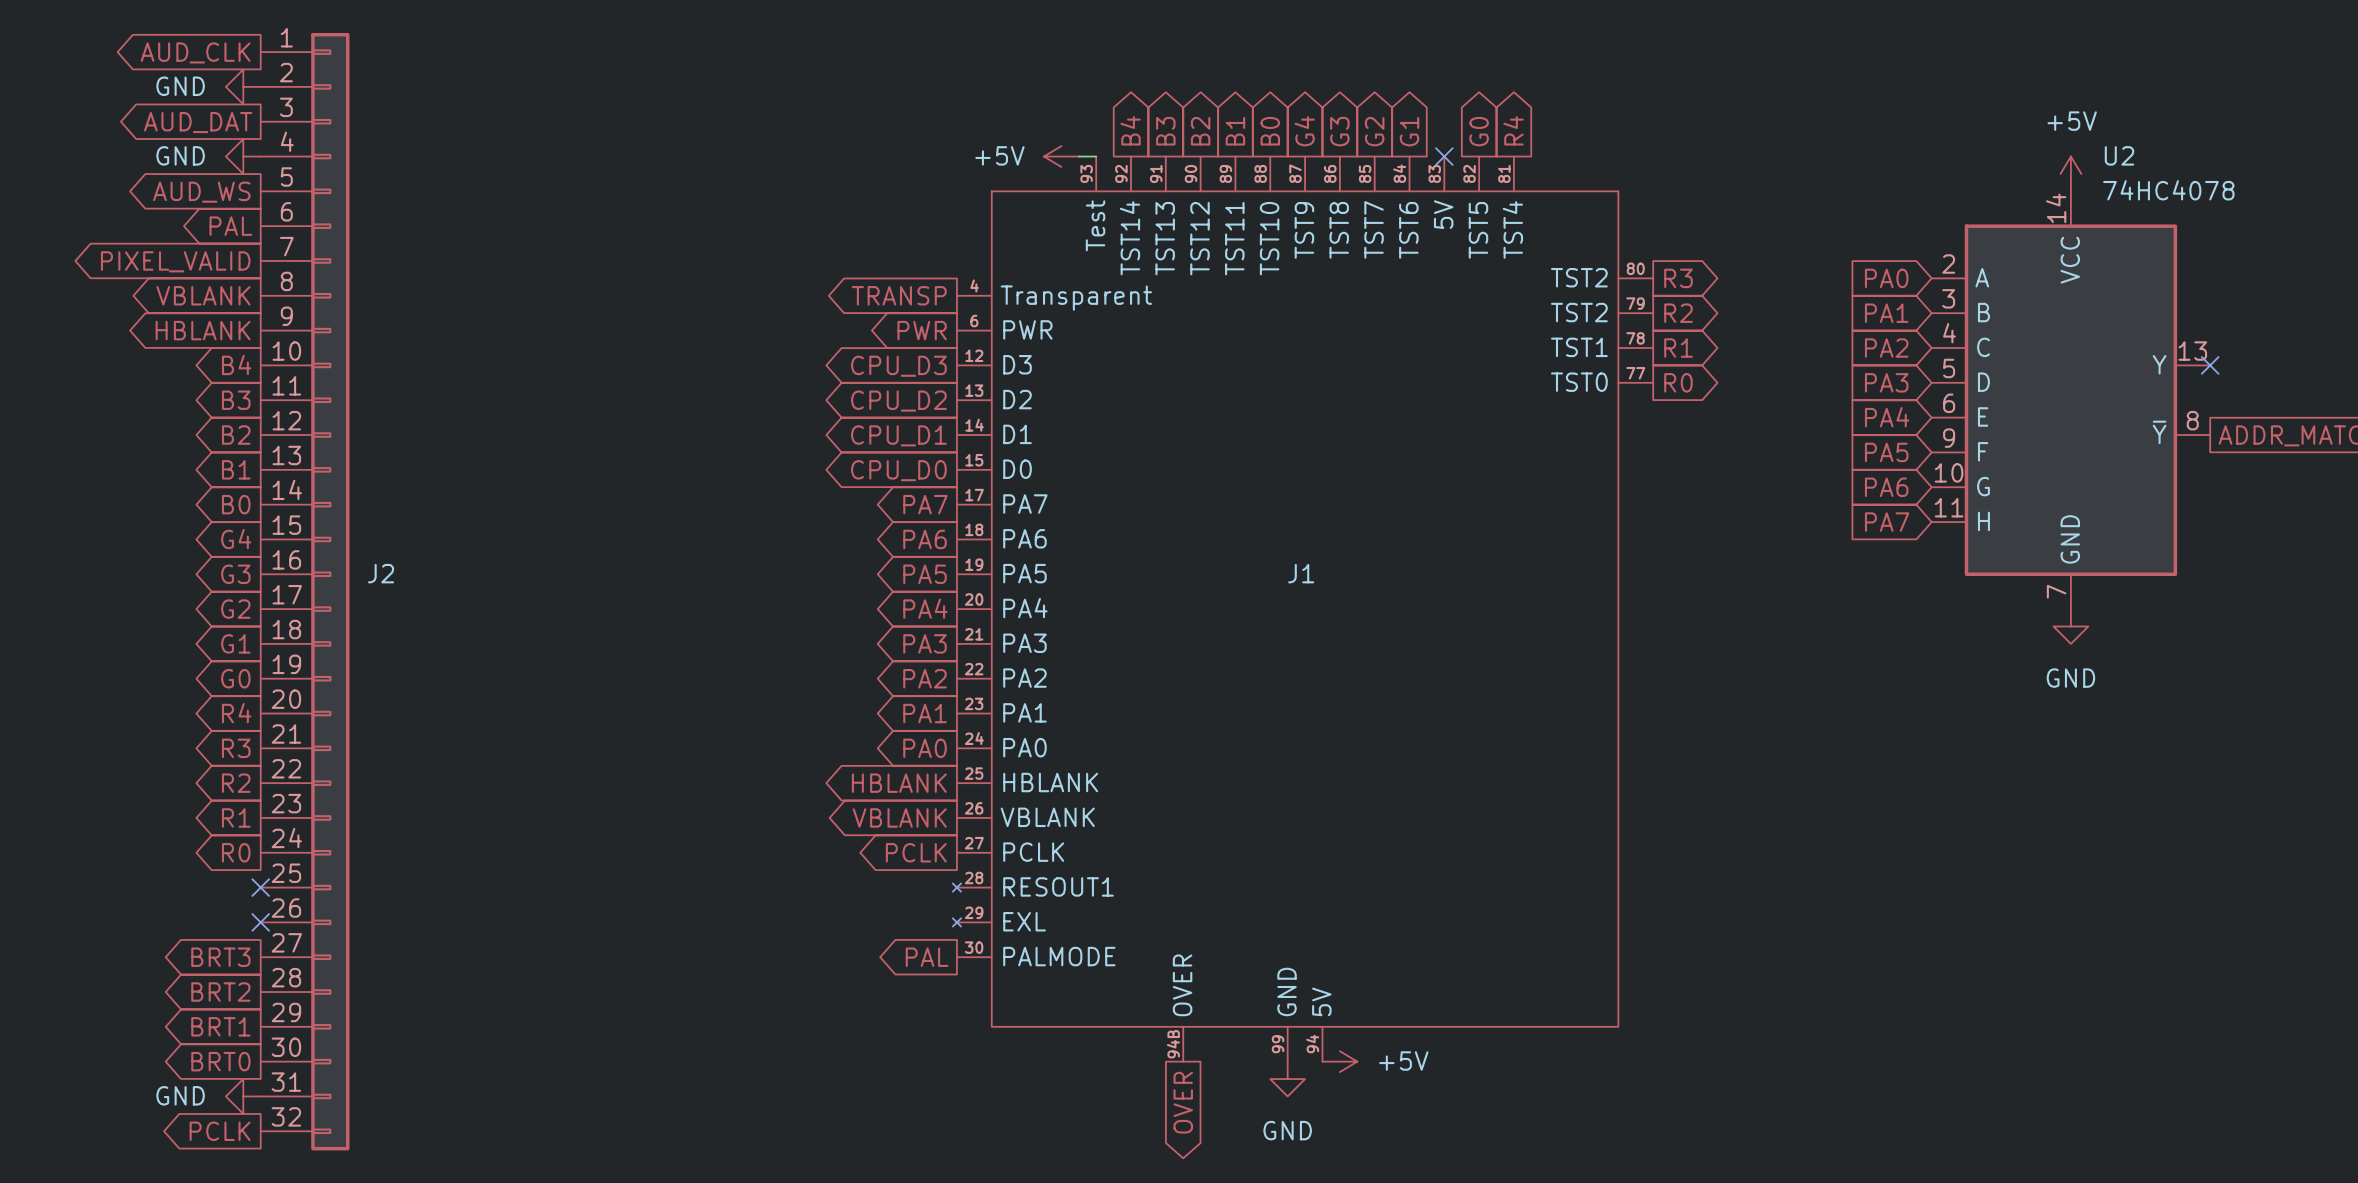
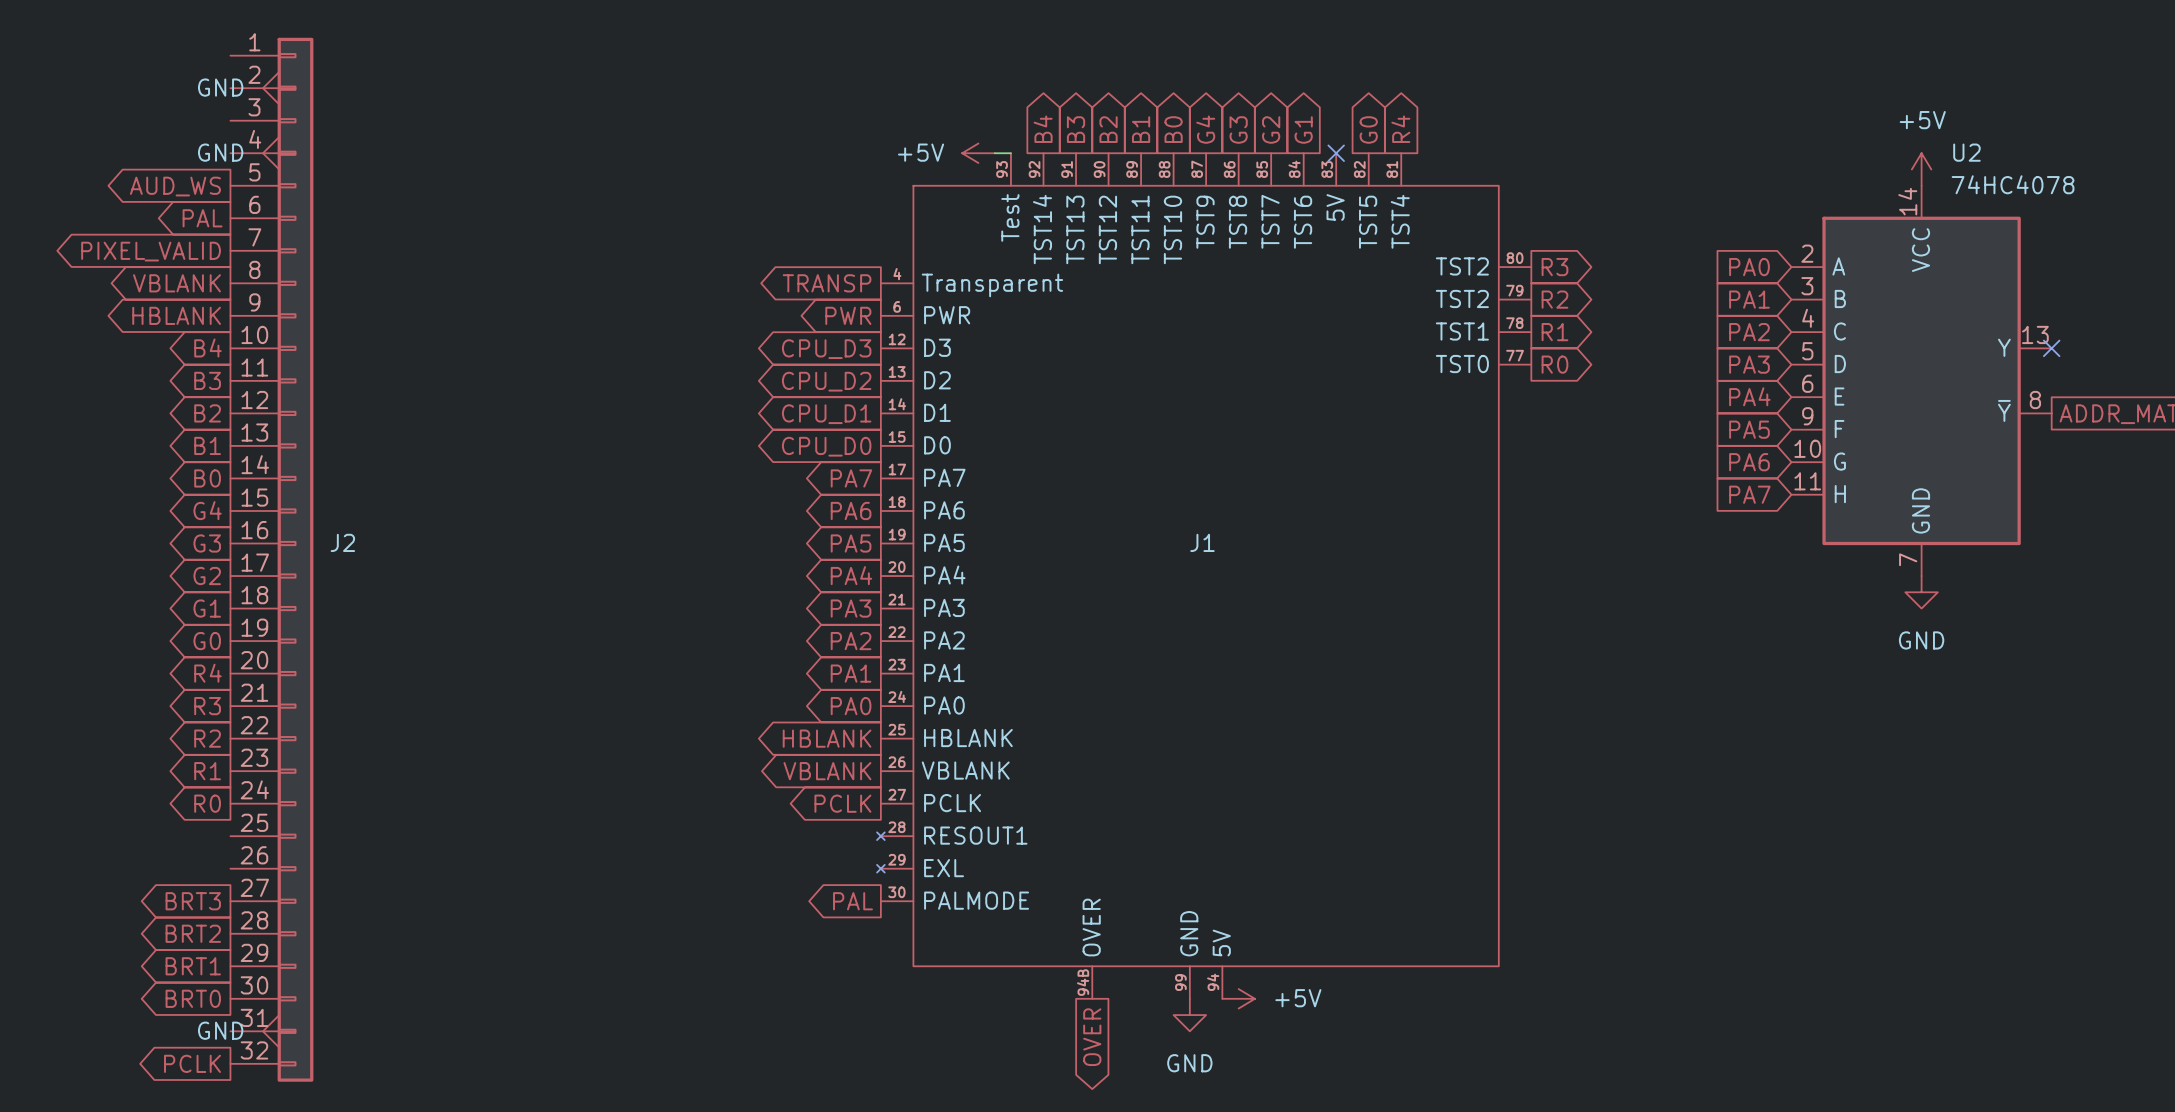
global label: AUD_CLK (195, 52) -> none
power symbol: GND (243, 86) -> none
power symbol: none -> GND (279, 88)
global label: AUD_DAT (198, 122) -> none
power symbol: GND (243, 156) -> none
power symbol: none -> GND (279, 153)
no-connect mark: (260, 887) -> none
no-connect mark: (260, 922) -> none
power symbol position: GND (243, 1096) -> GND (279, 1031)

